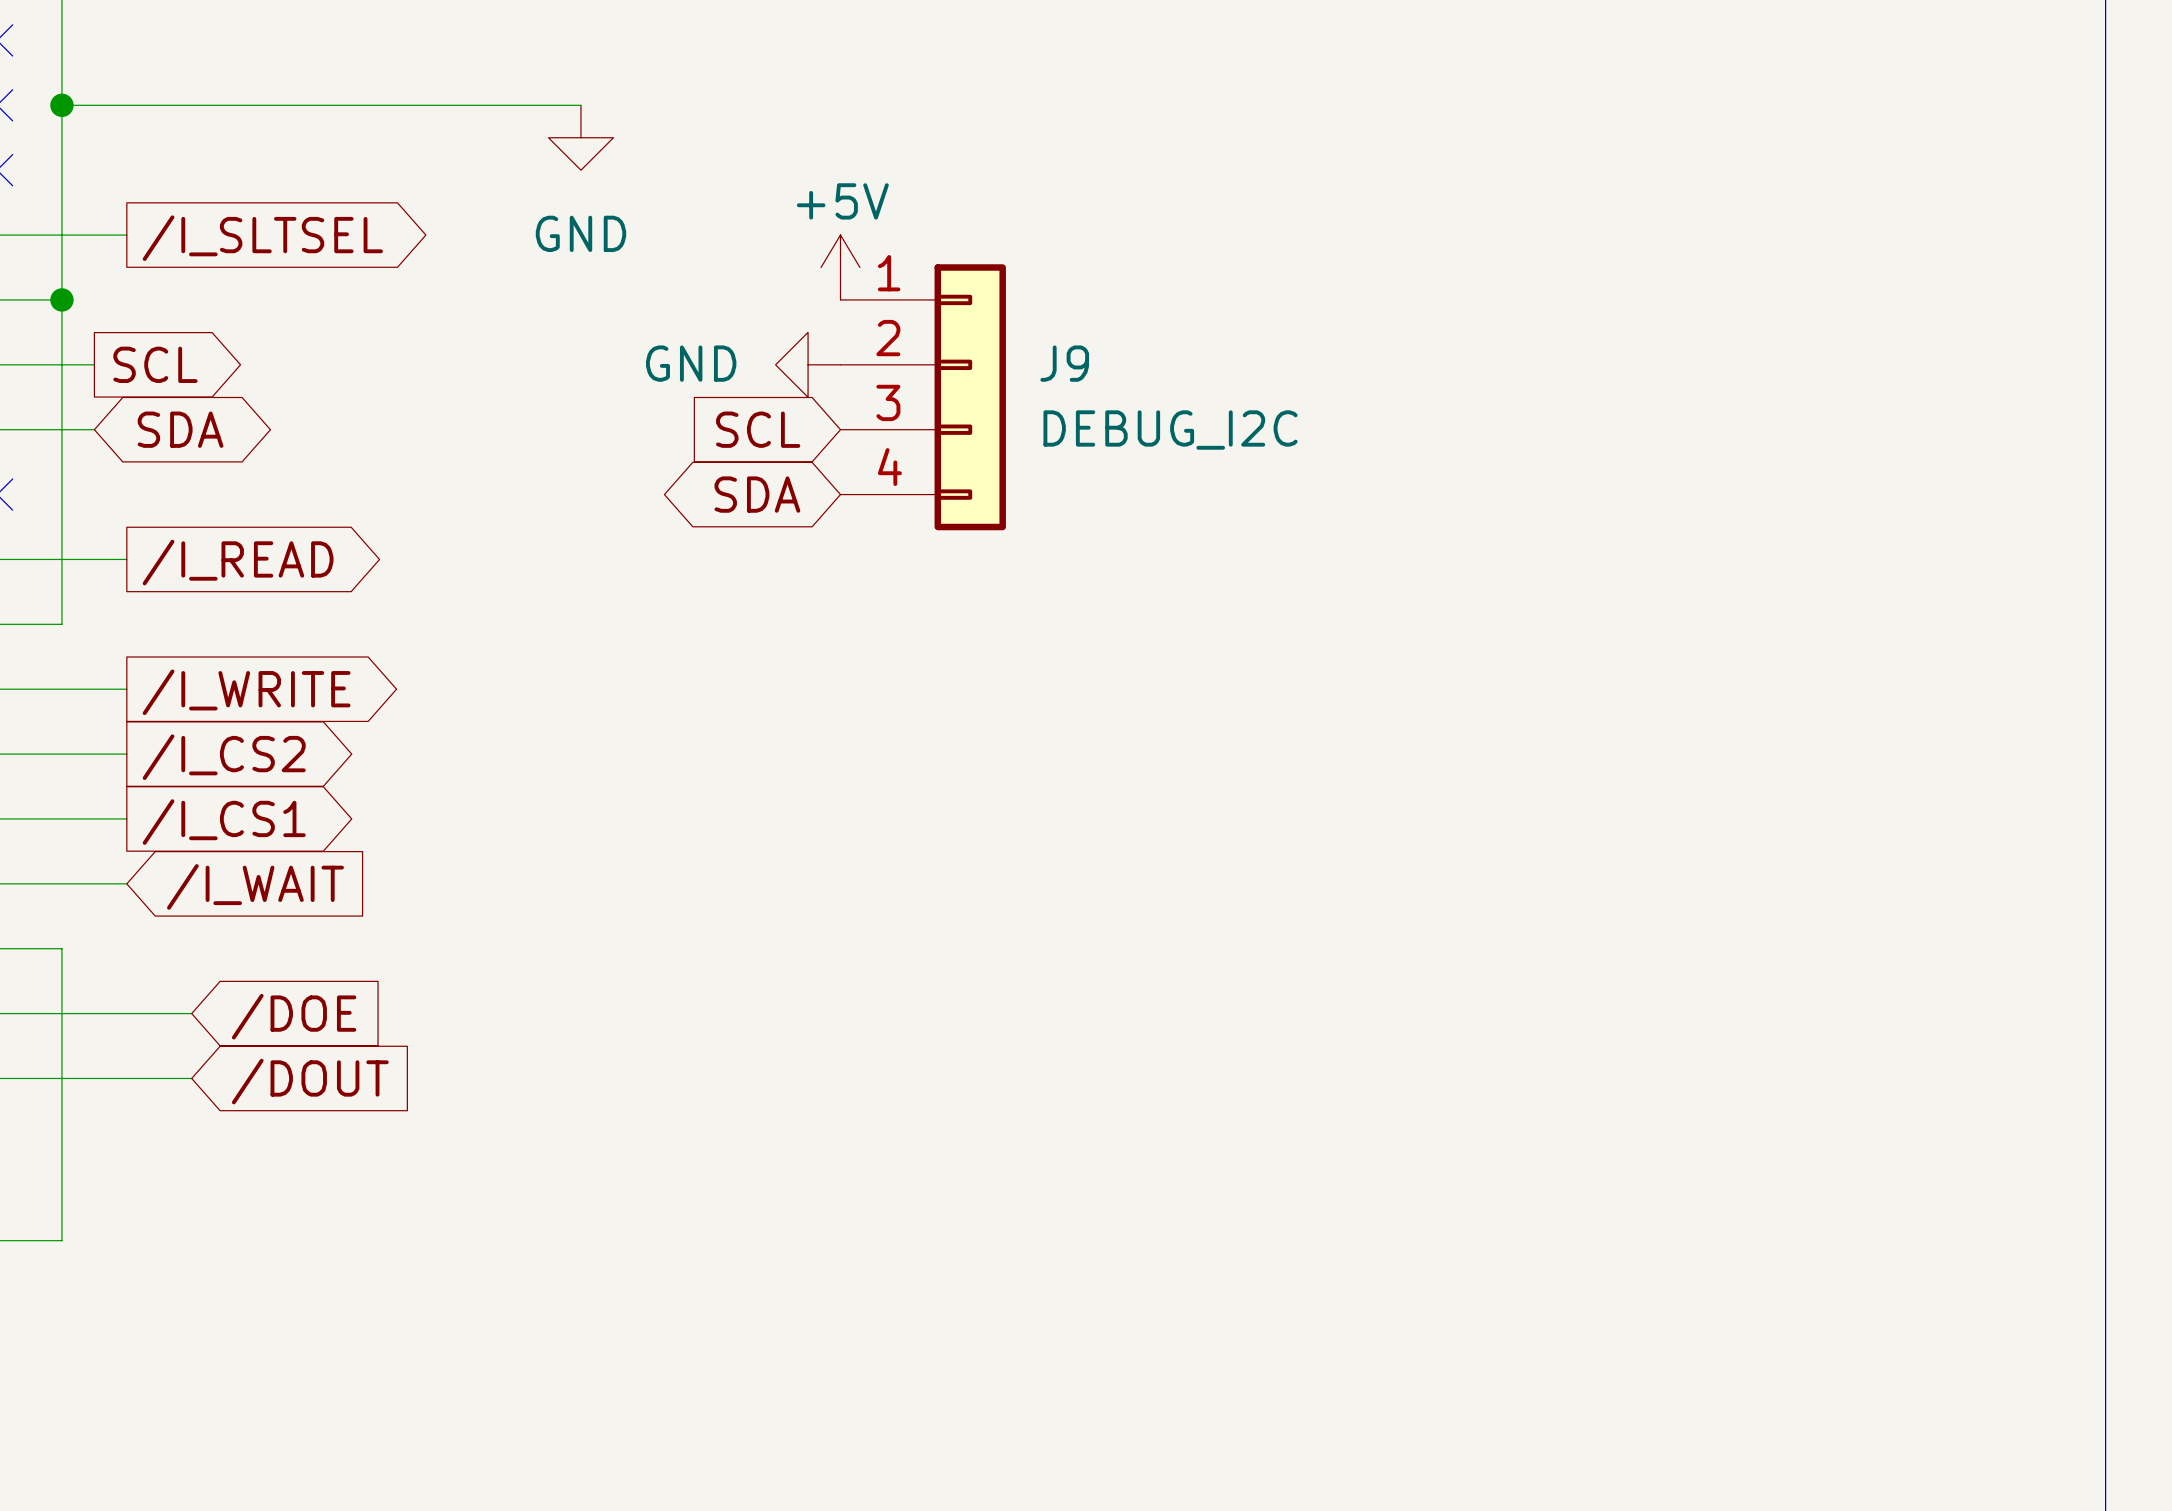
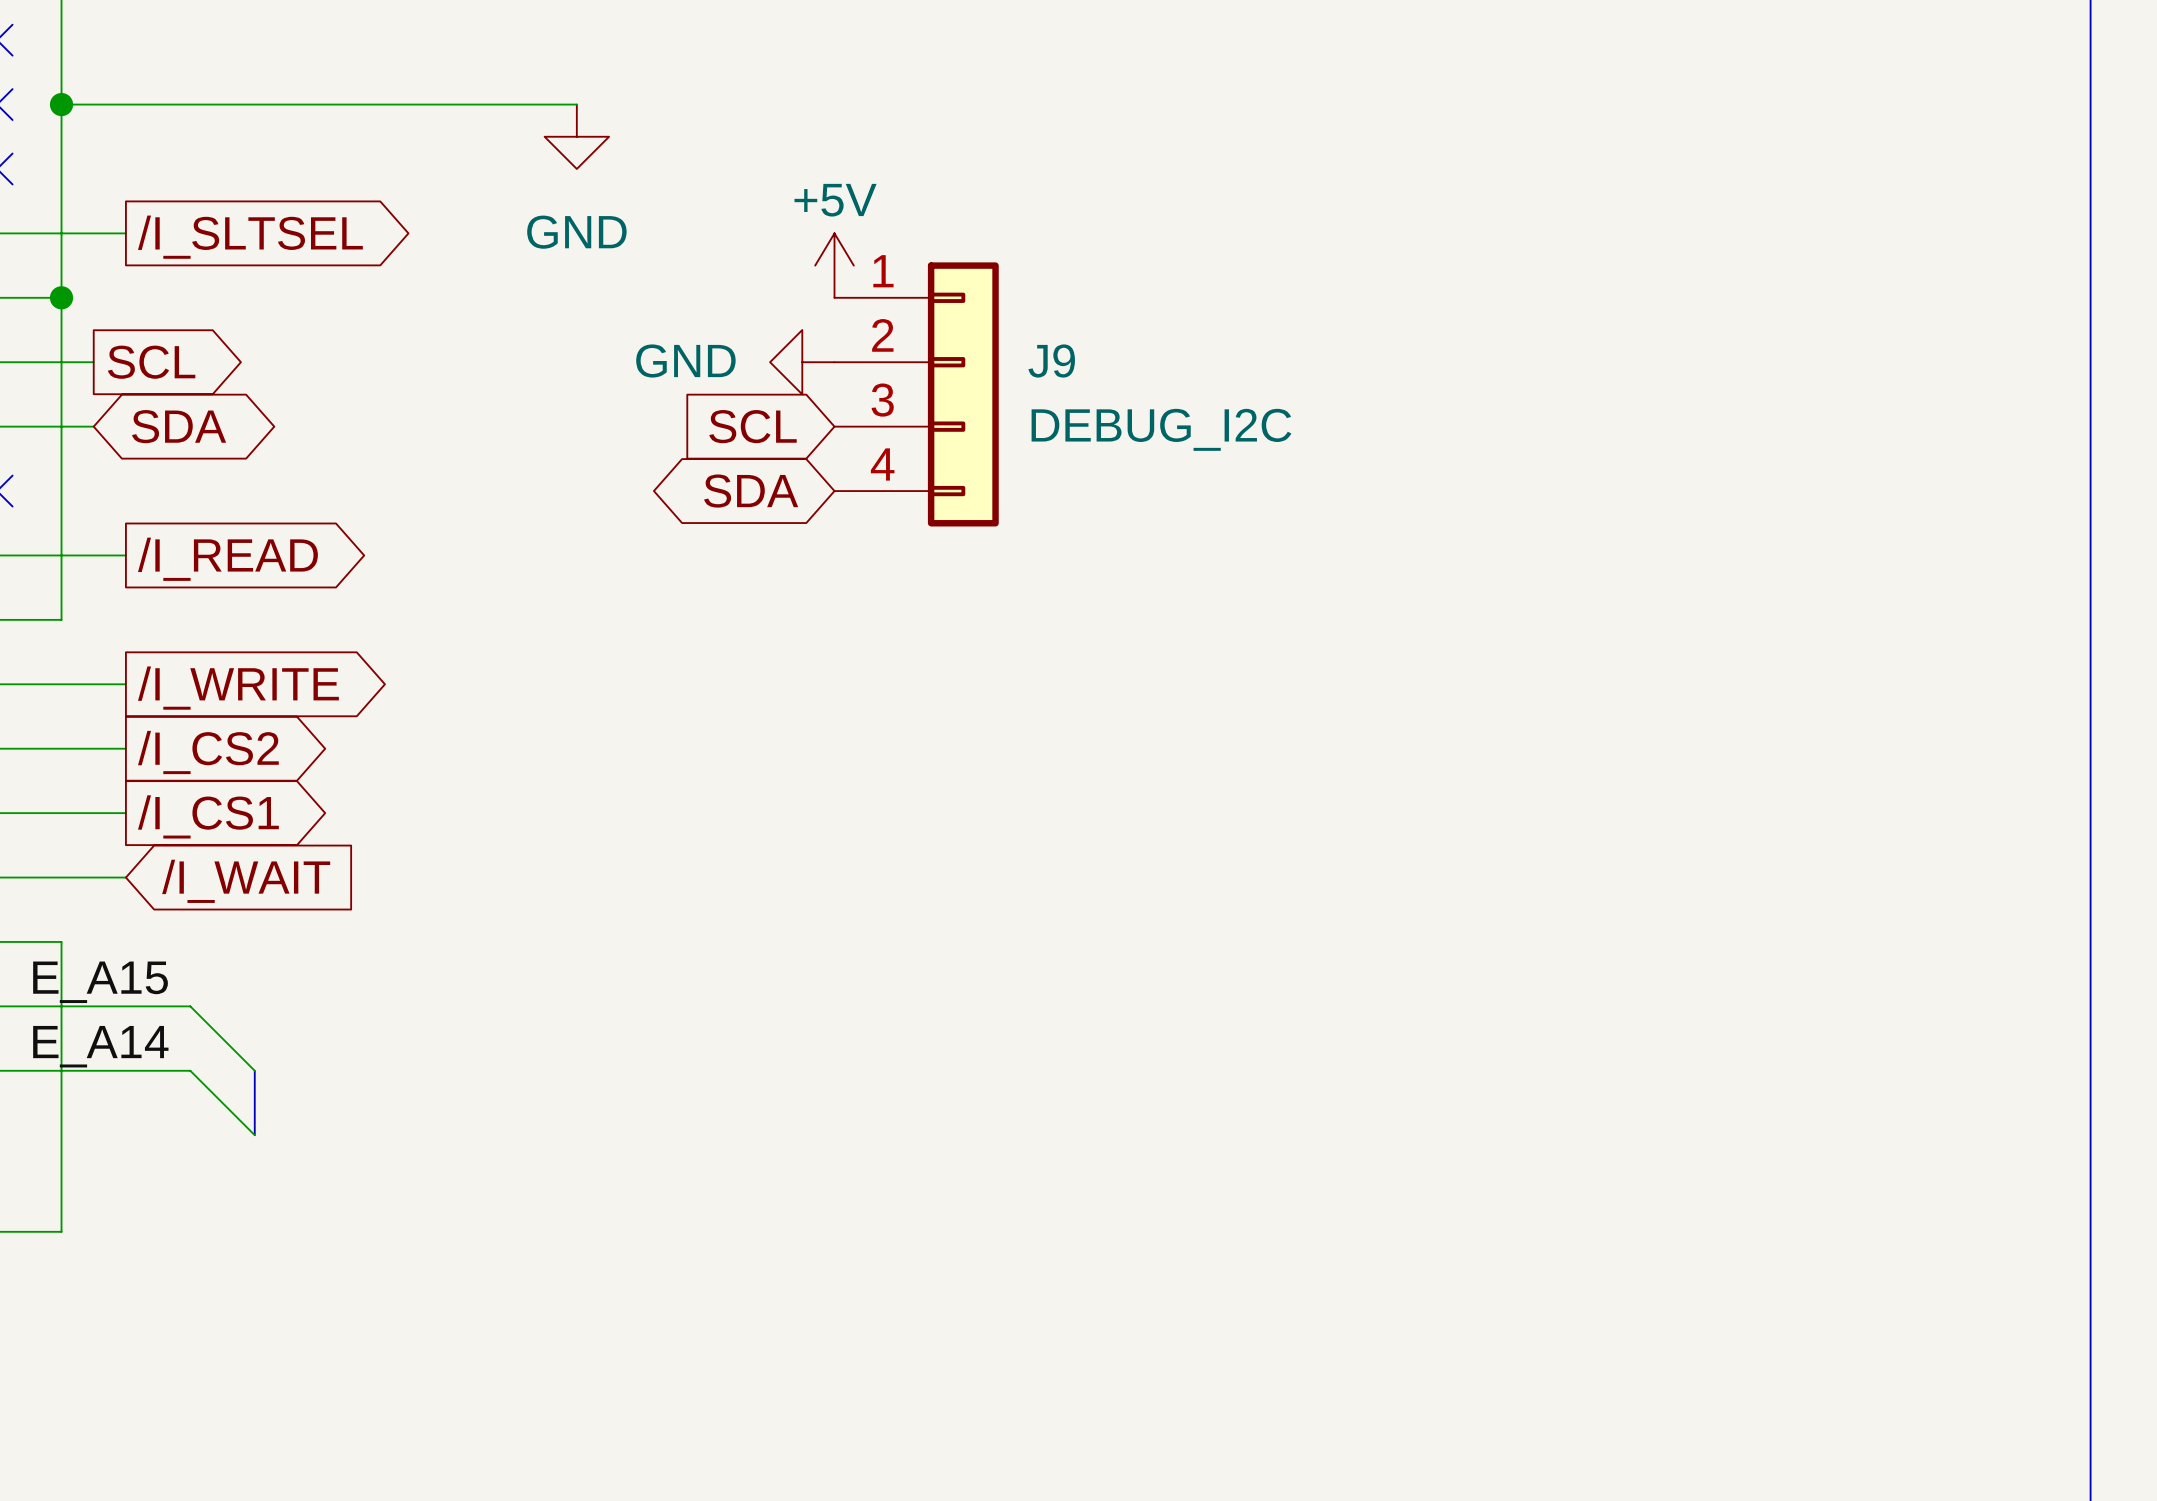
label: none -> E_A15 (100, 982)
wire: none -> (190, 1006) (254, 1070)
global label: /DOE (294, 1016) -> none
label: none -> E_A14 (100, 1046)
wire: none -> (190, 1070) (254, 1135)
bus: none -> (254, 1070) (254, 1135)
global label: /DOUT (310, 1081) -> none

